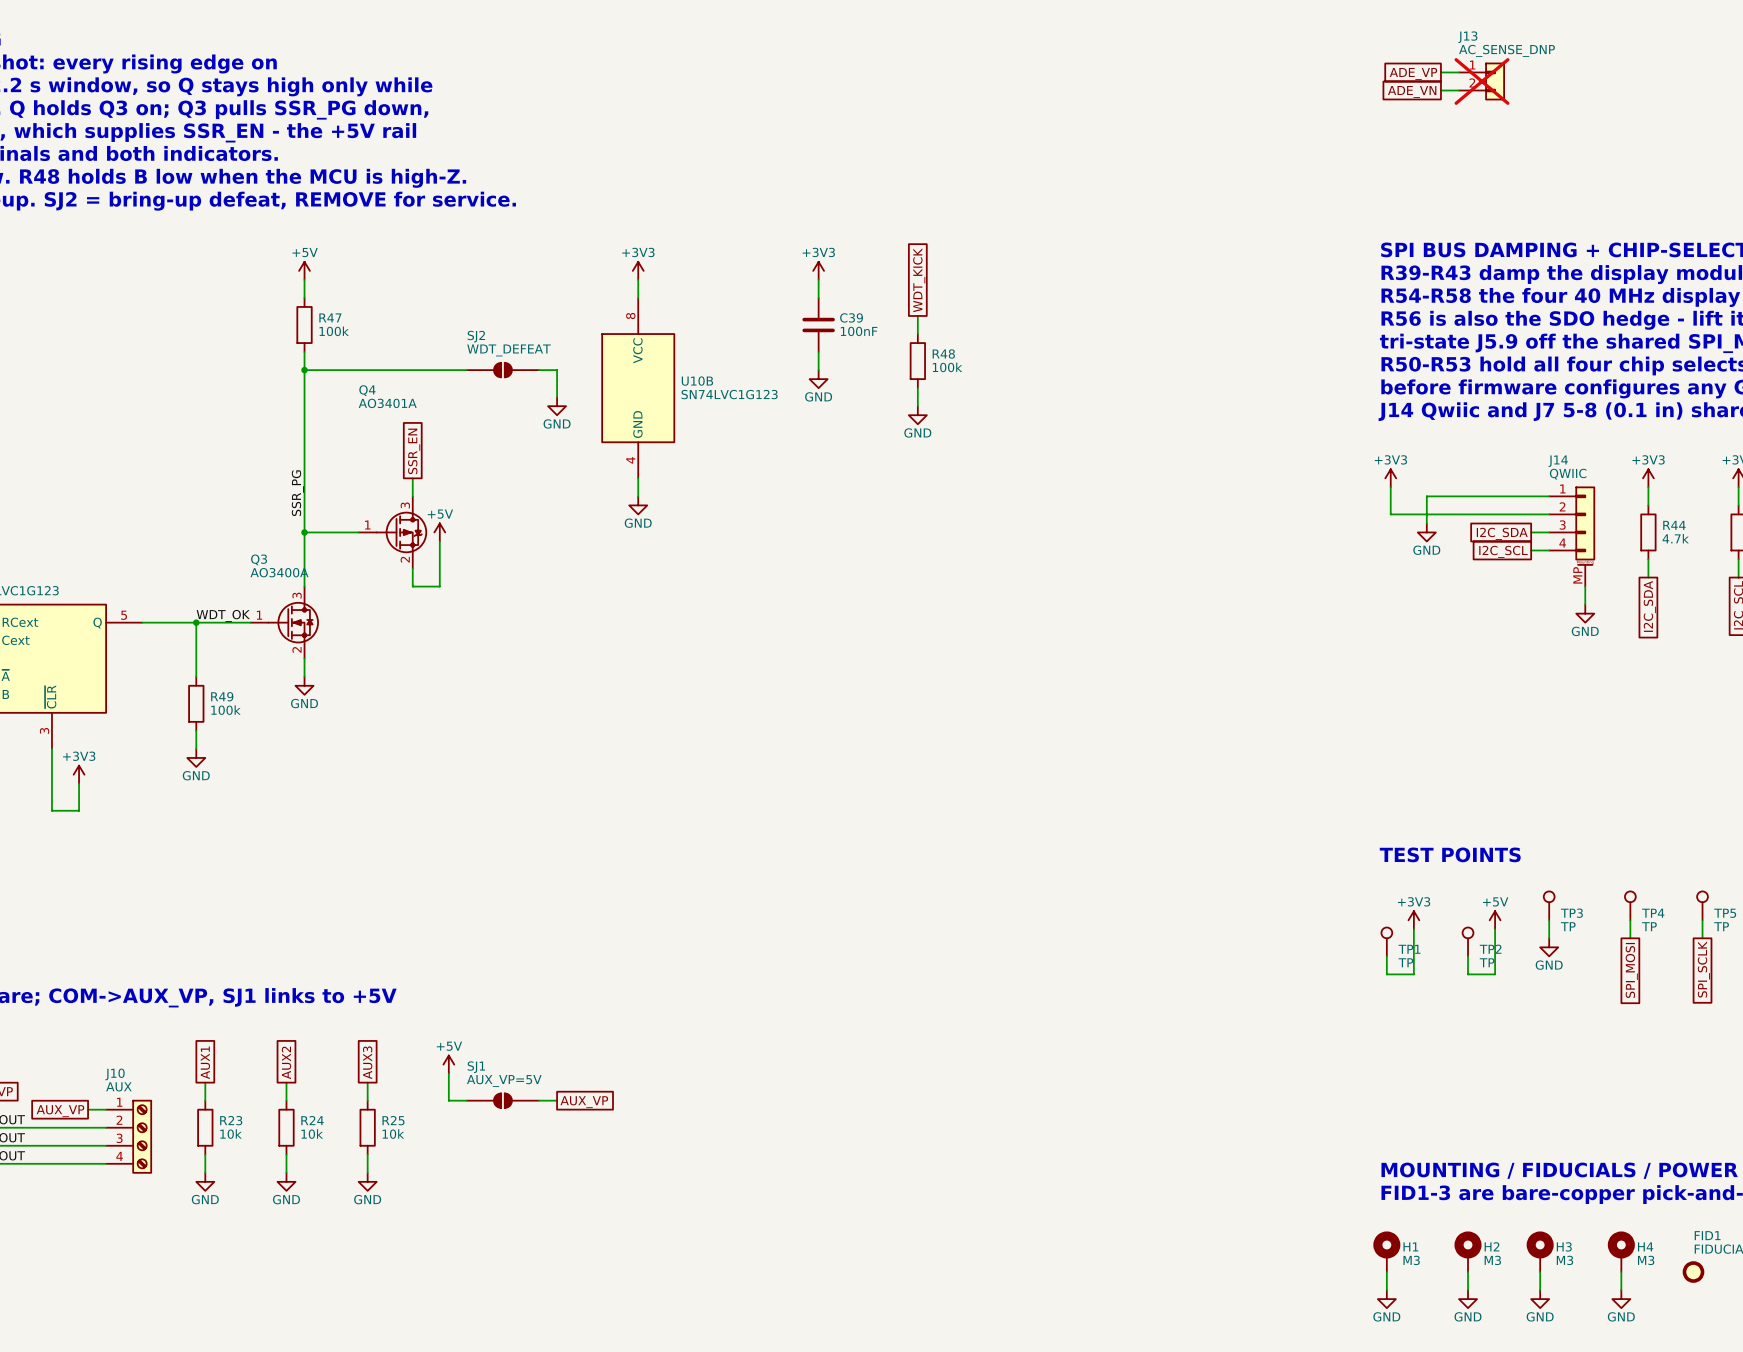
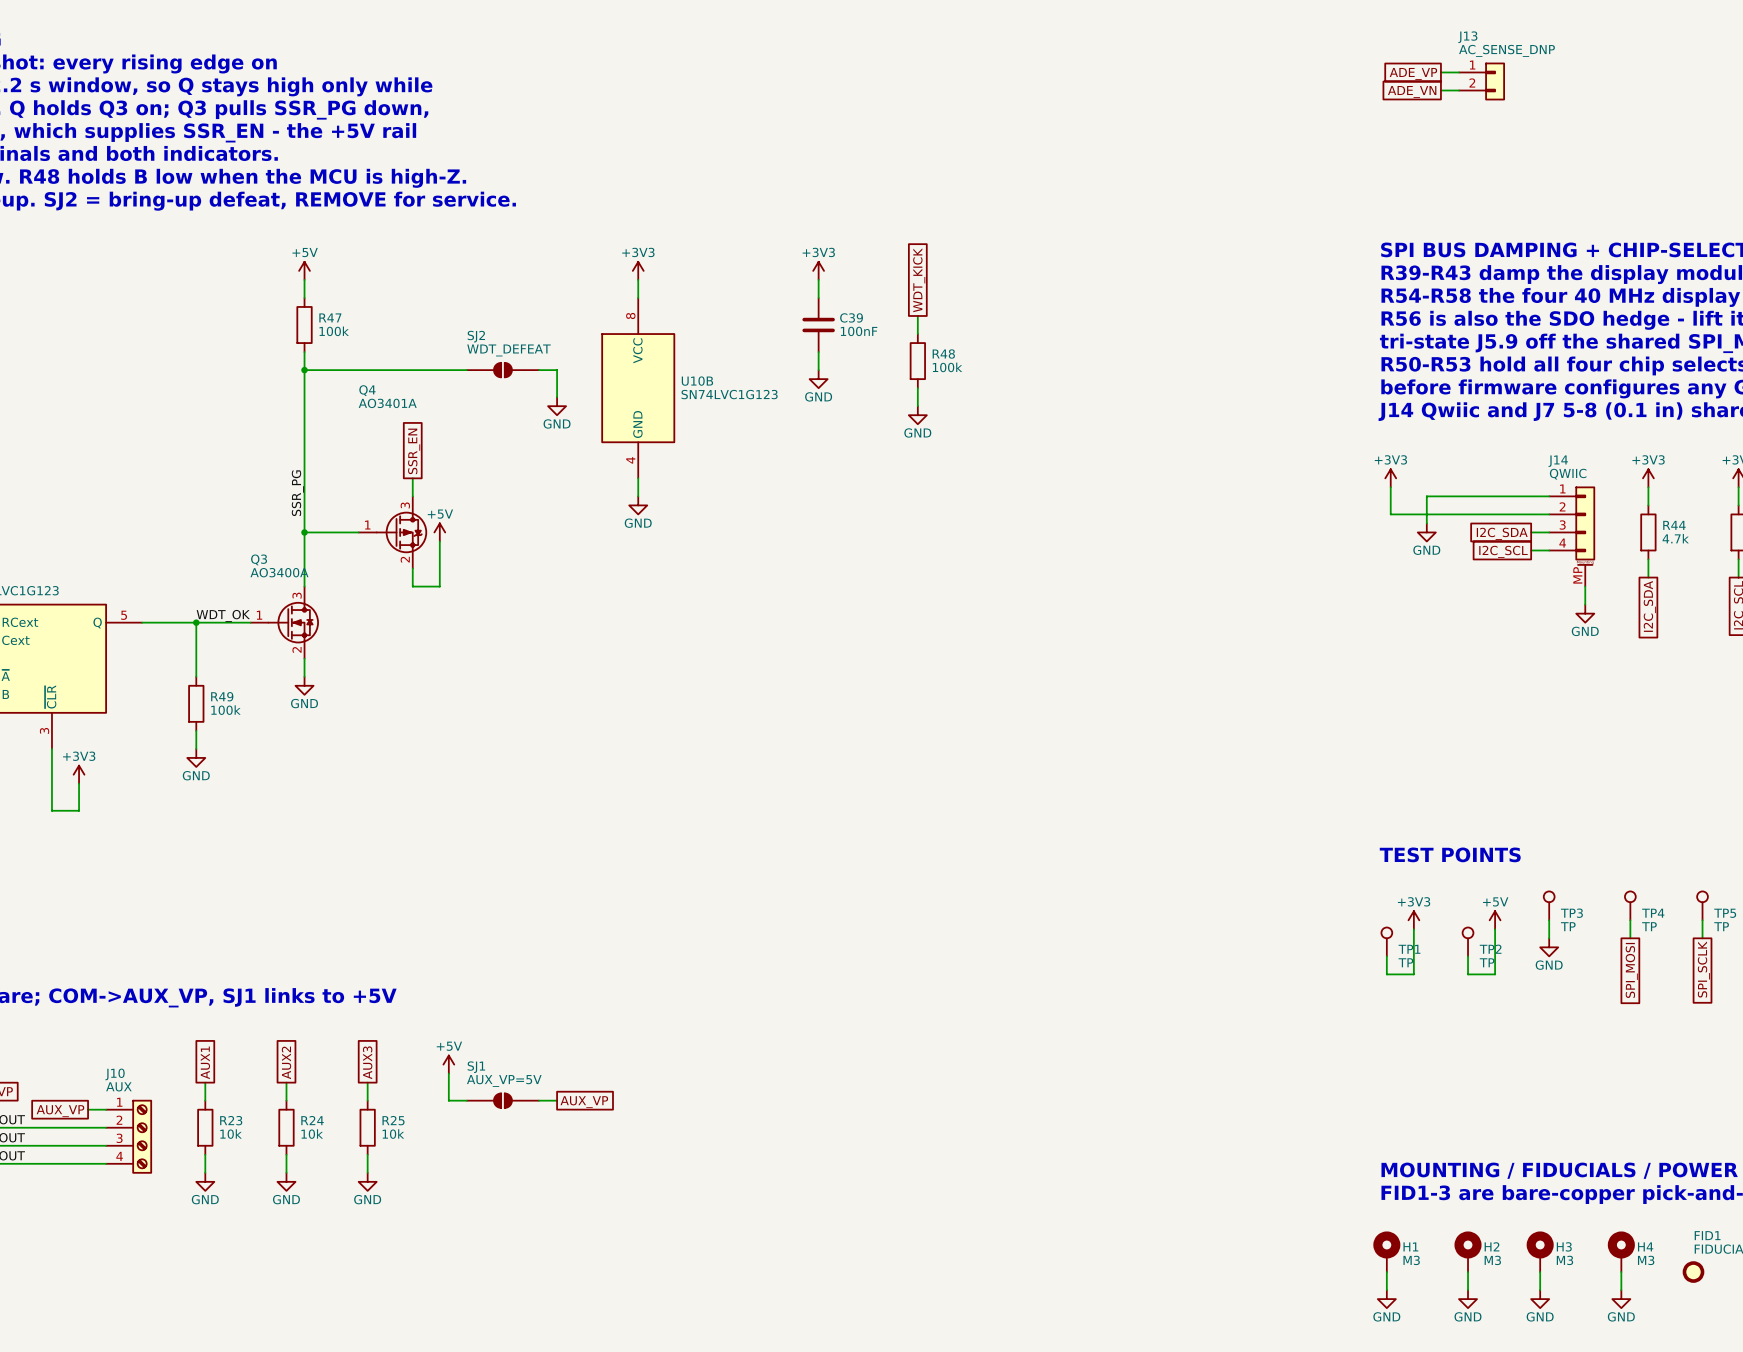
J13 do-not-place cross: (1481, 81) -> none

